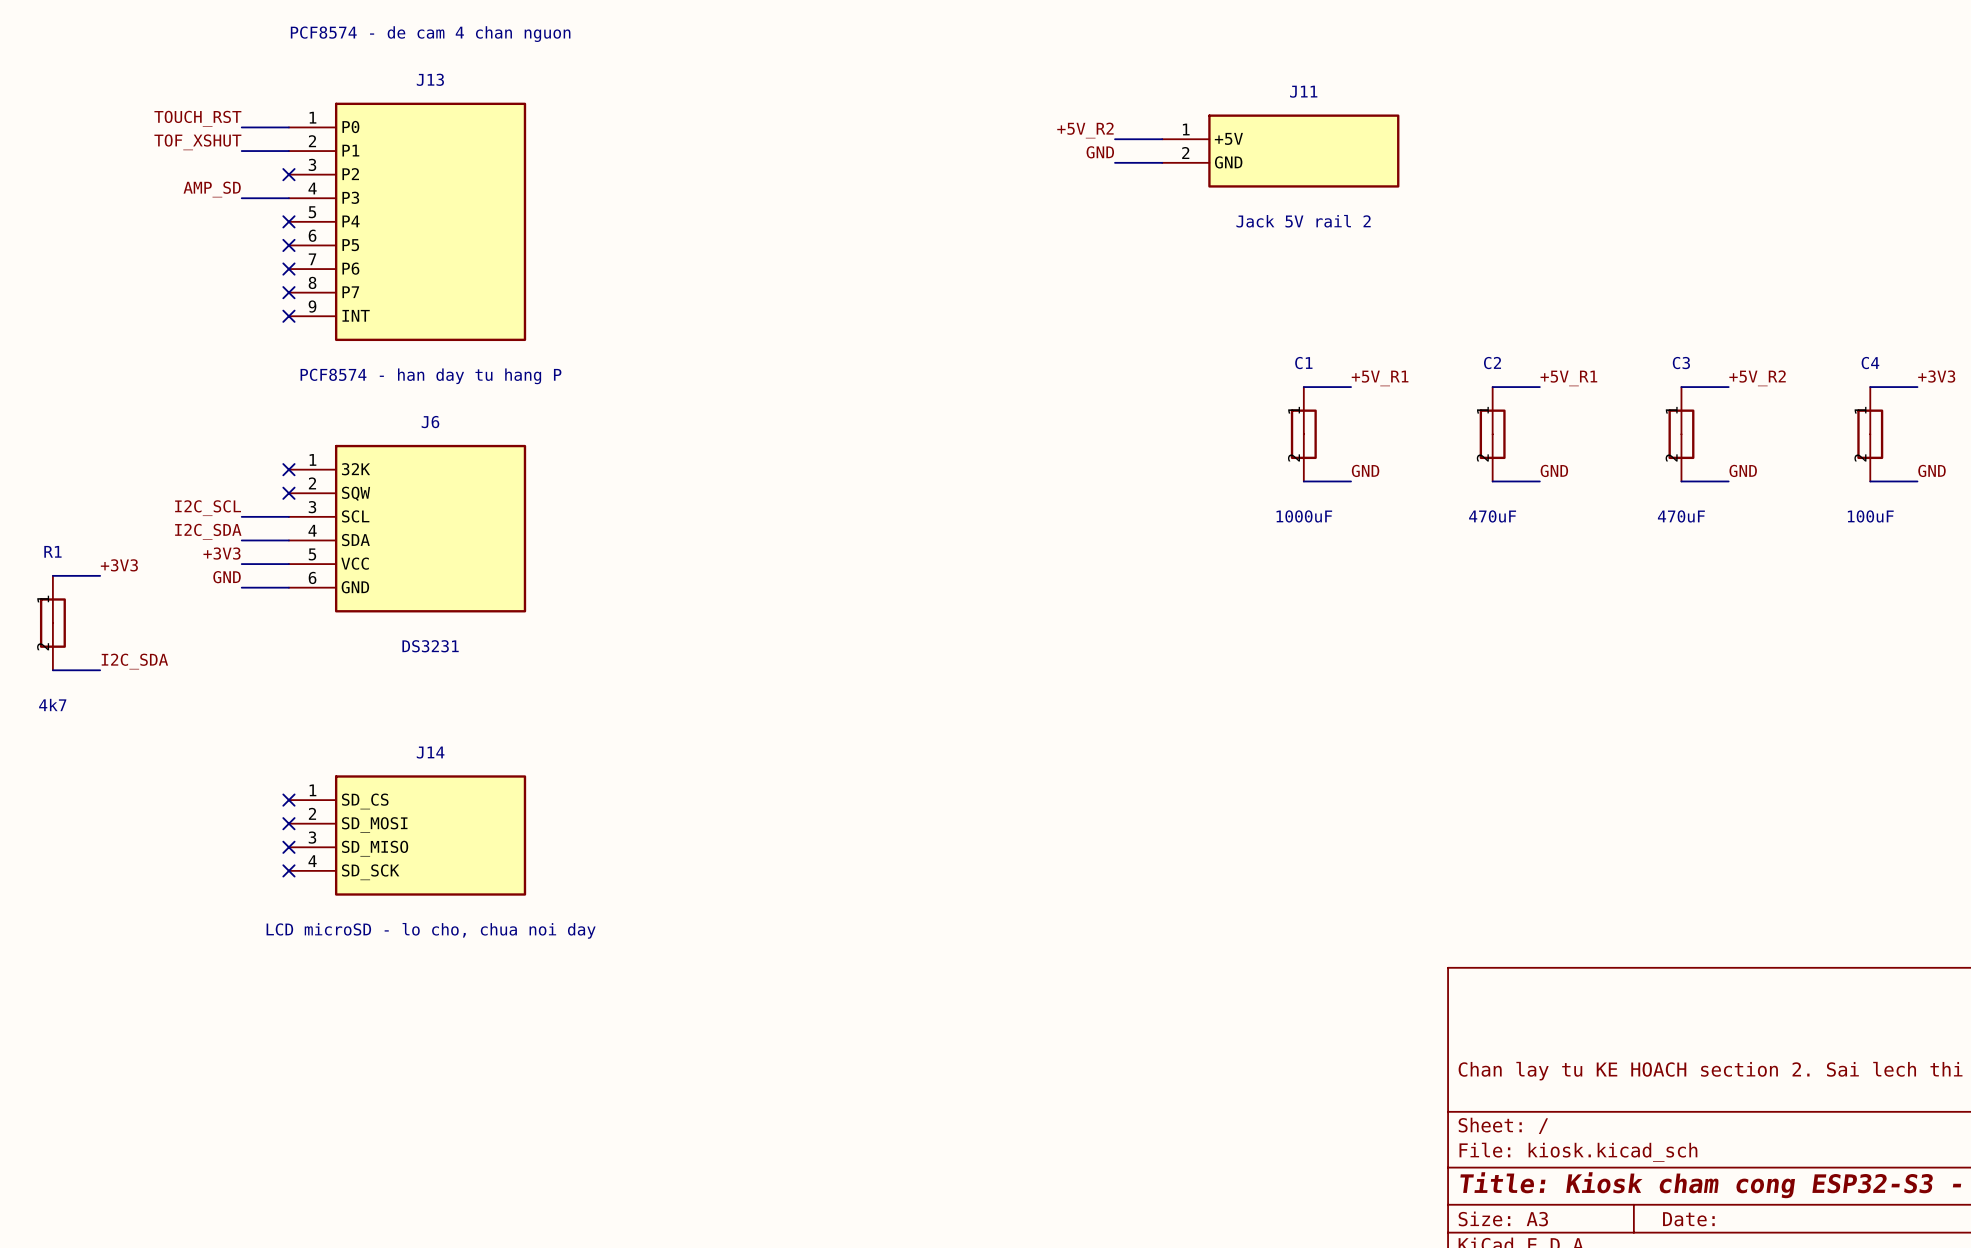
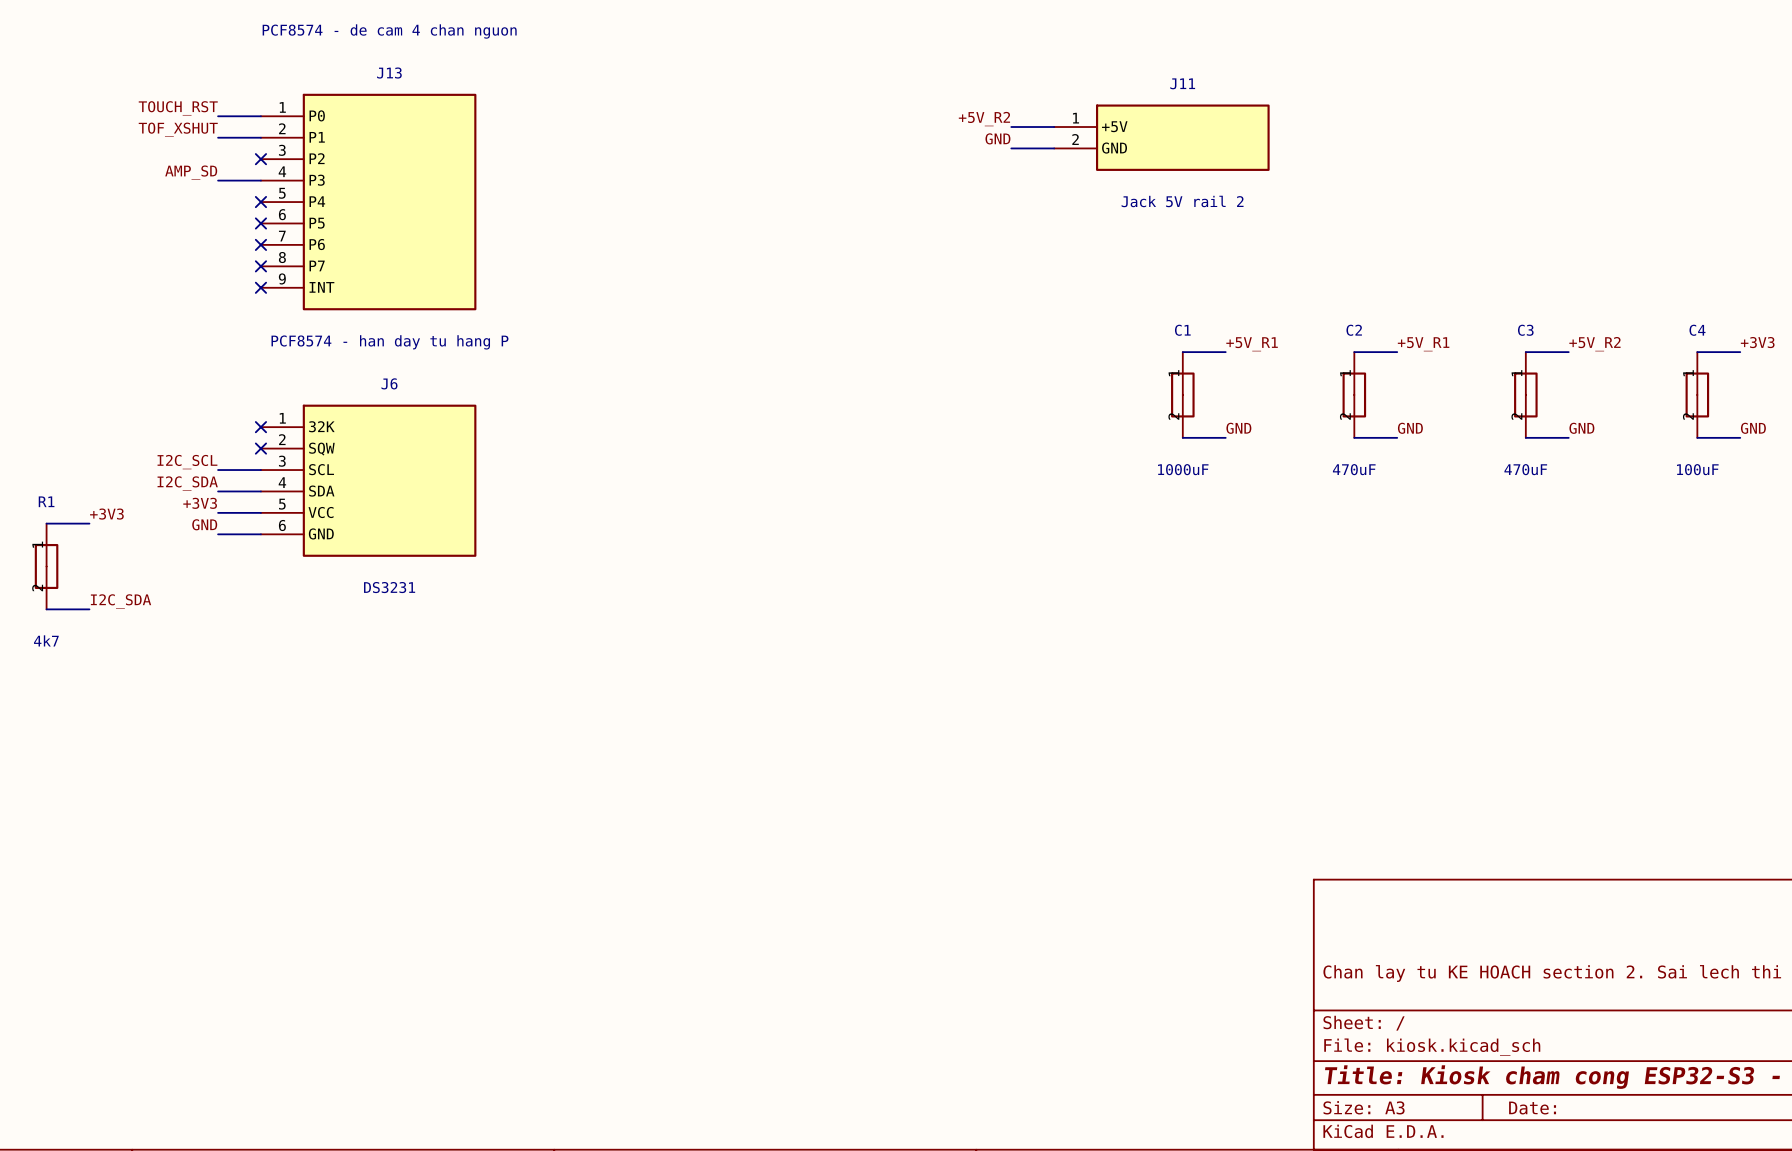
no-connect mark: (288, 800) -> none
no-connect mark: (288, 823) -> none
J14: LCD microSD - lo cho, chua noi day (407, 835) -> none
no-connect mark: (288, 847) -> none
no-connect mark: (288, 870) -> none

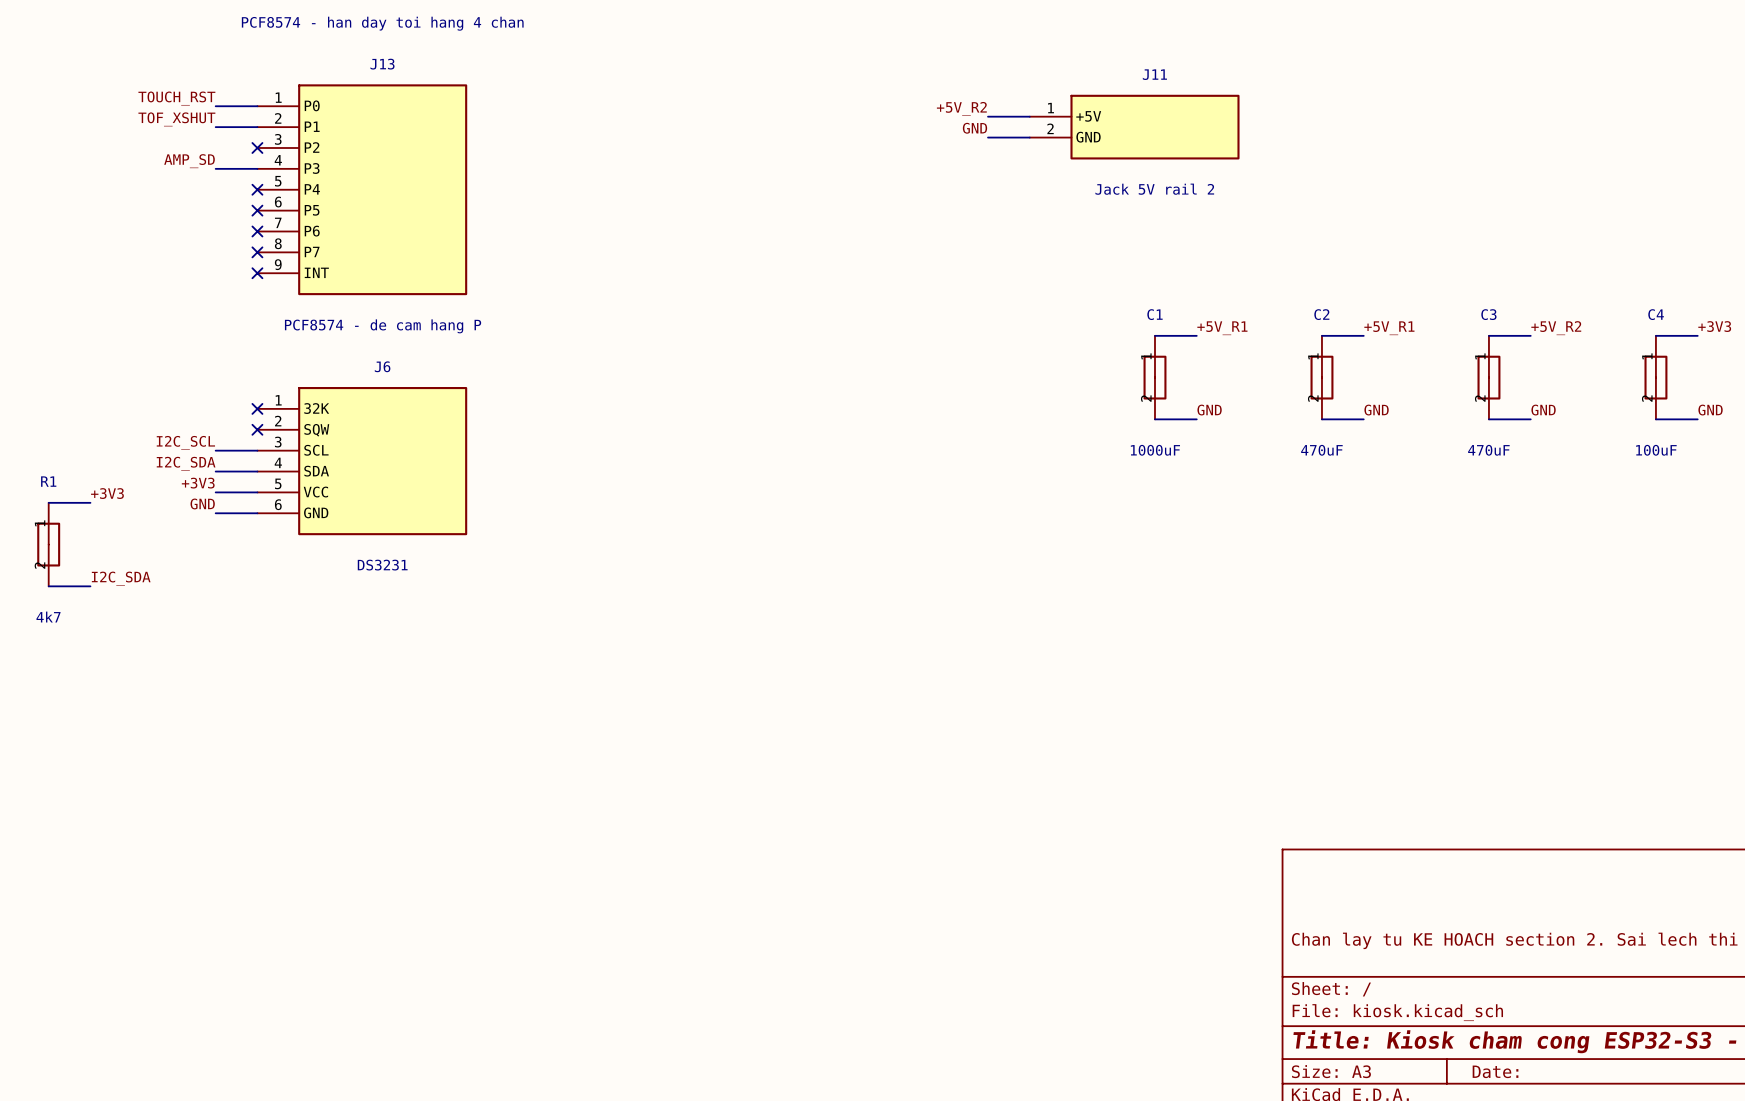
part value: PCF8574 - de cam 4 chan nguon (389, 31) -> PCF8574 - han day toi hang 4 chan (382, 23)
J13 value: PCF8574 - han day tu hang P (389, 342) -> PCF8574 - de cam hang P (383, 326)

